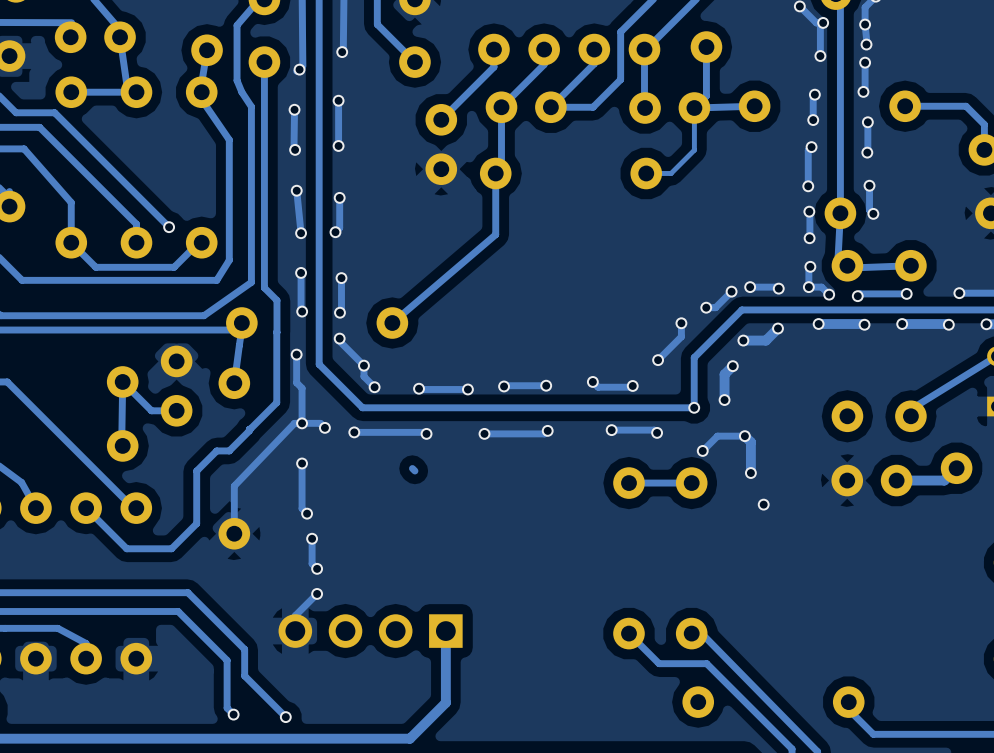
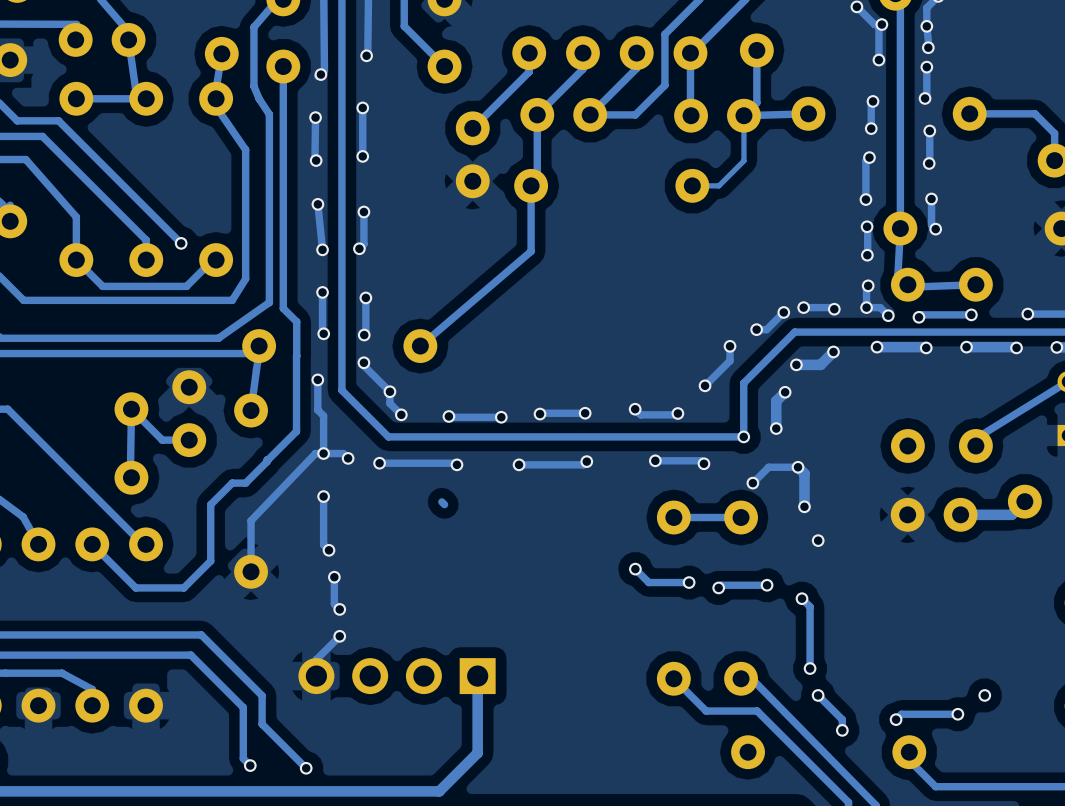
track: none -> (635, 569) (648, 582) (689, 582)
via: none -> (635, 569)
via: none -> (689, 582)
track: none -> (767, 585) (721, 585) (718, 587)
via: none -> (767, 585)
via: none -> (718, 587)
track: none -> (802, 598) (810, 606) (810, 668)
via: none -> (802, 598)
via: none -> (810, 668)
track: none -> (818, 695) (842, 719) (842, 730)
via: none -> (818, 695)
via: none -> (984, 695)
track: none -> (957, 714) (901, 714) (896, 719)
via: none -> (957, 714)
via: none -> (896, 719)
via: none -> (842, 730)

